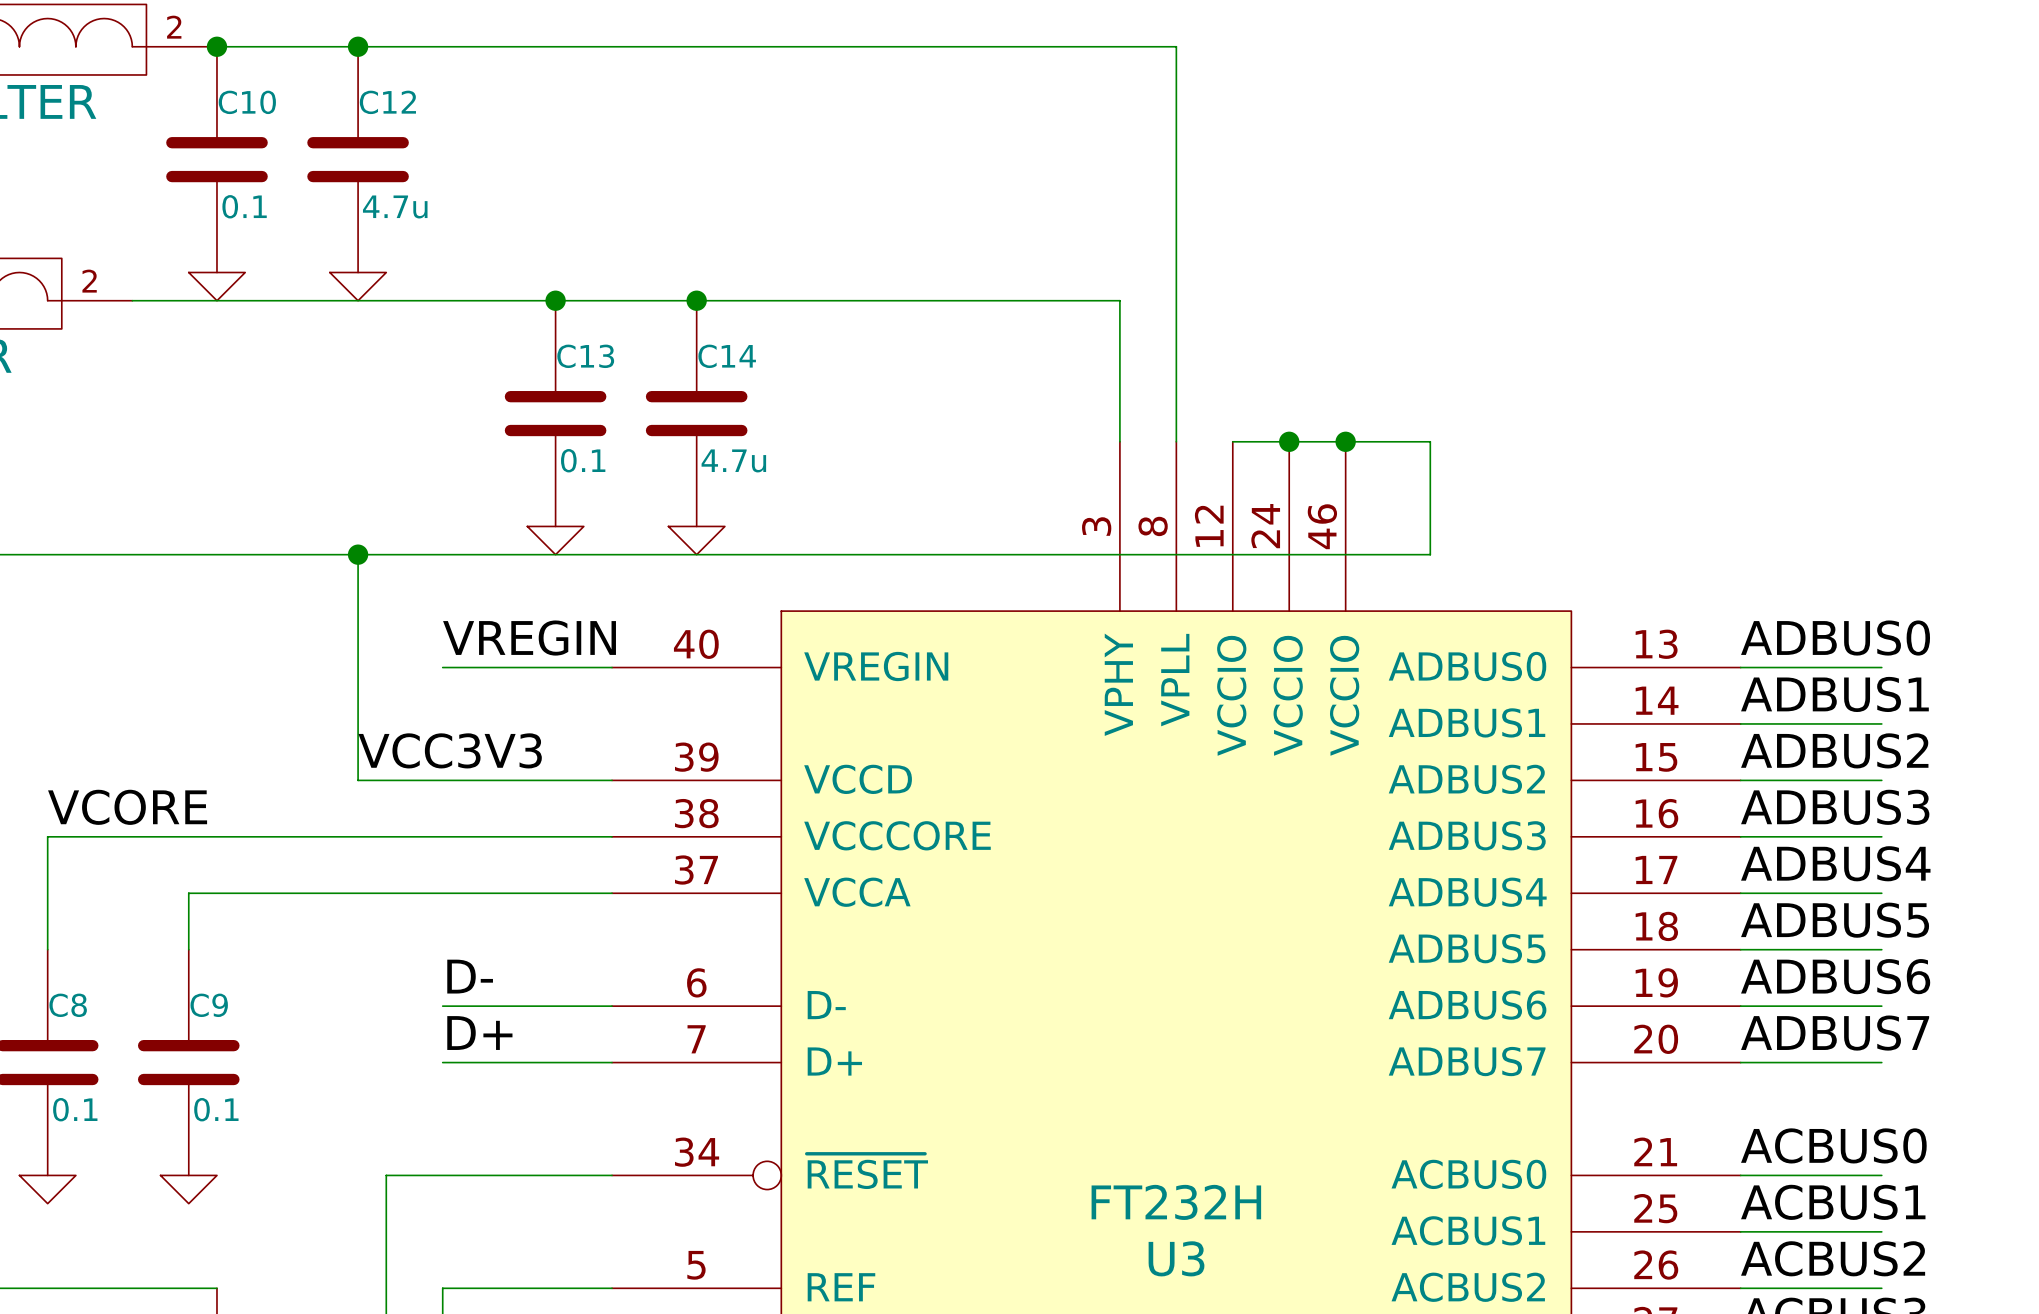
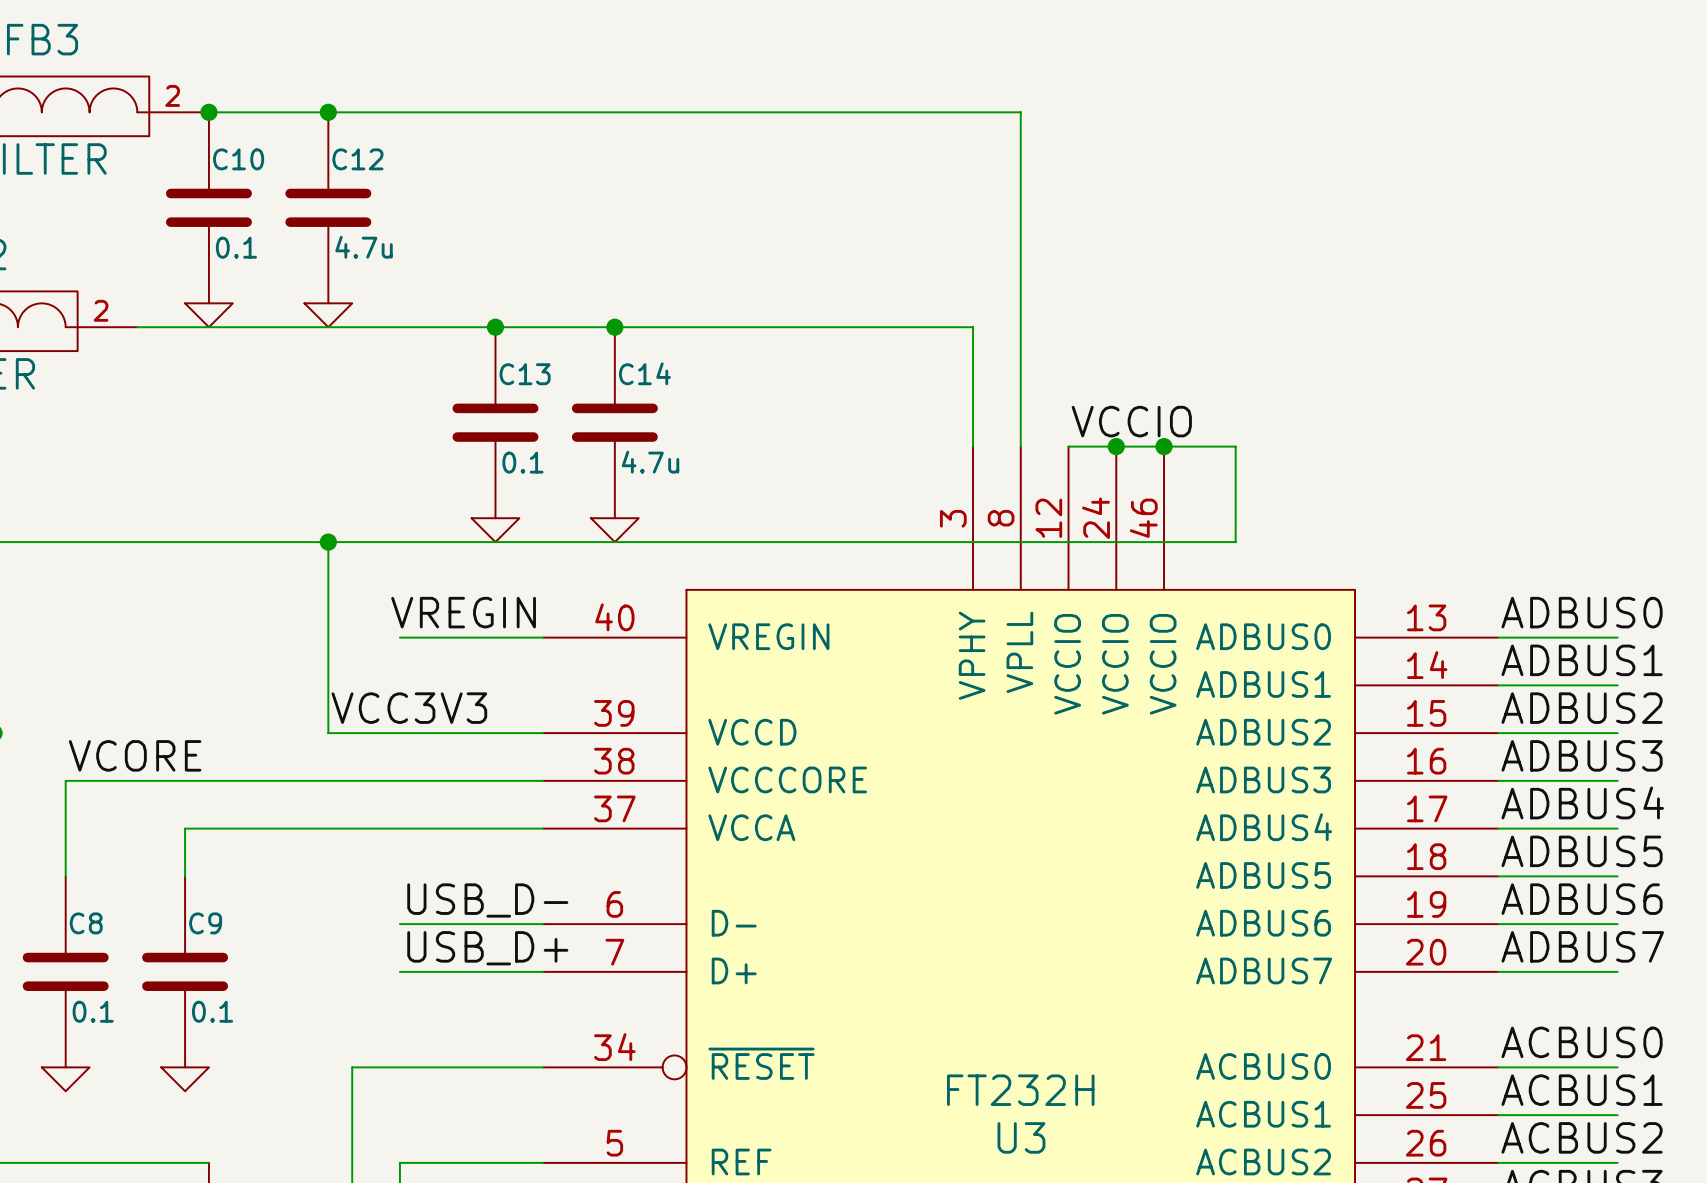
label: none -> VCCIO (1131, 421)
label position: VREGIN (529, 638) -> VREGIN (463, 612)
label: D- (470, 976) -> USB_D- (487, 900)
label: D+ (479, 1033) -> USB_D+ (487, 948)

